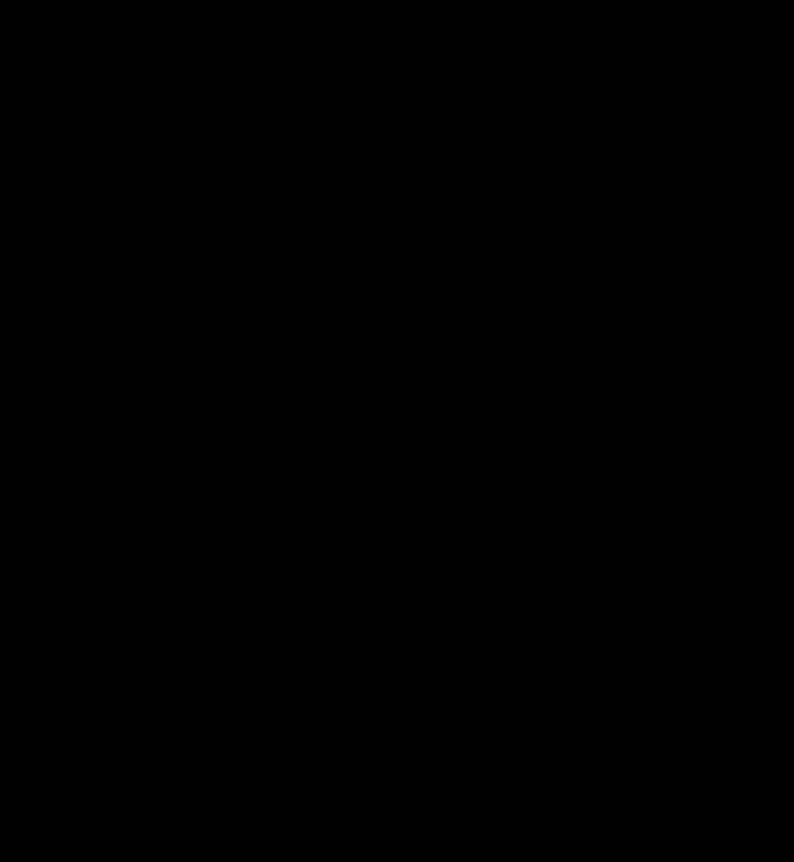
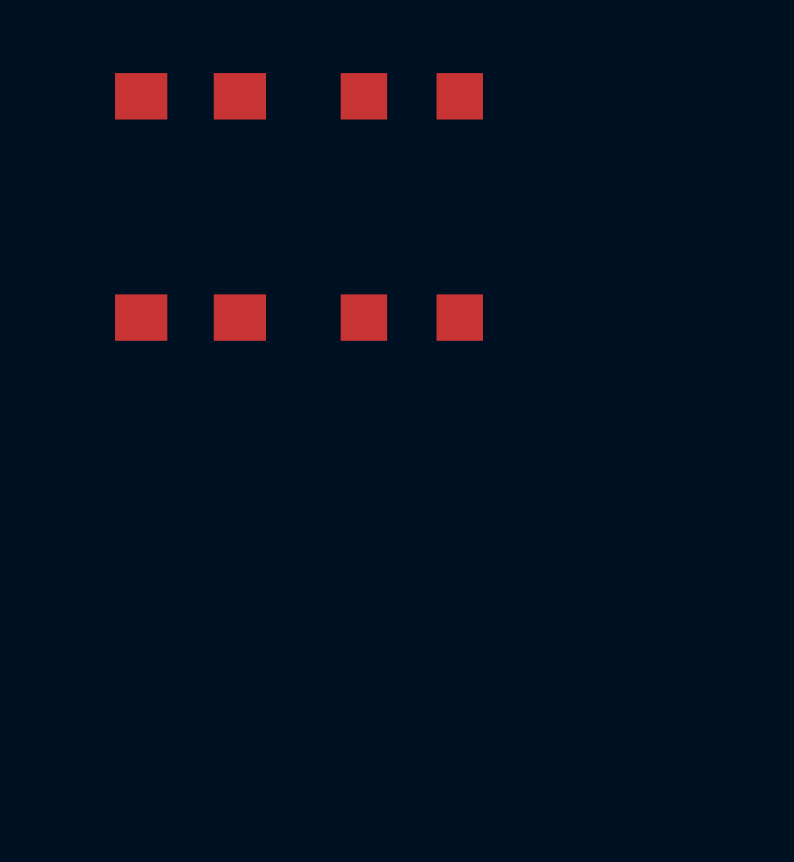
part: none -> (190, 96)
part: none -> (411, 96)
part: none -> (190, 317)
part: none -> (411, 317)

